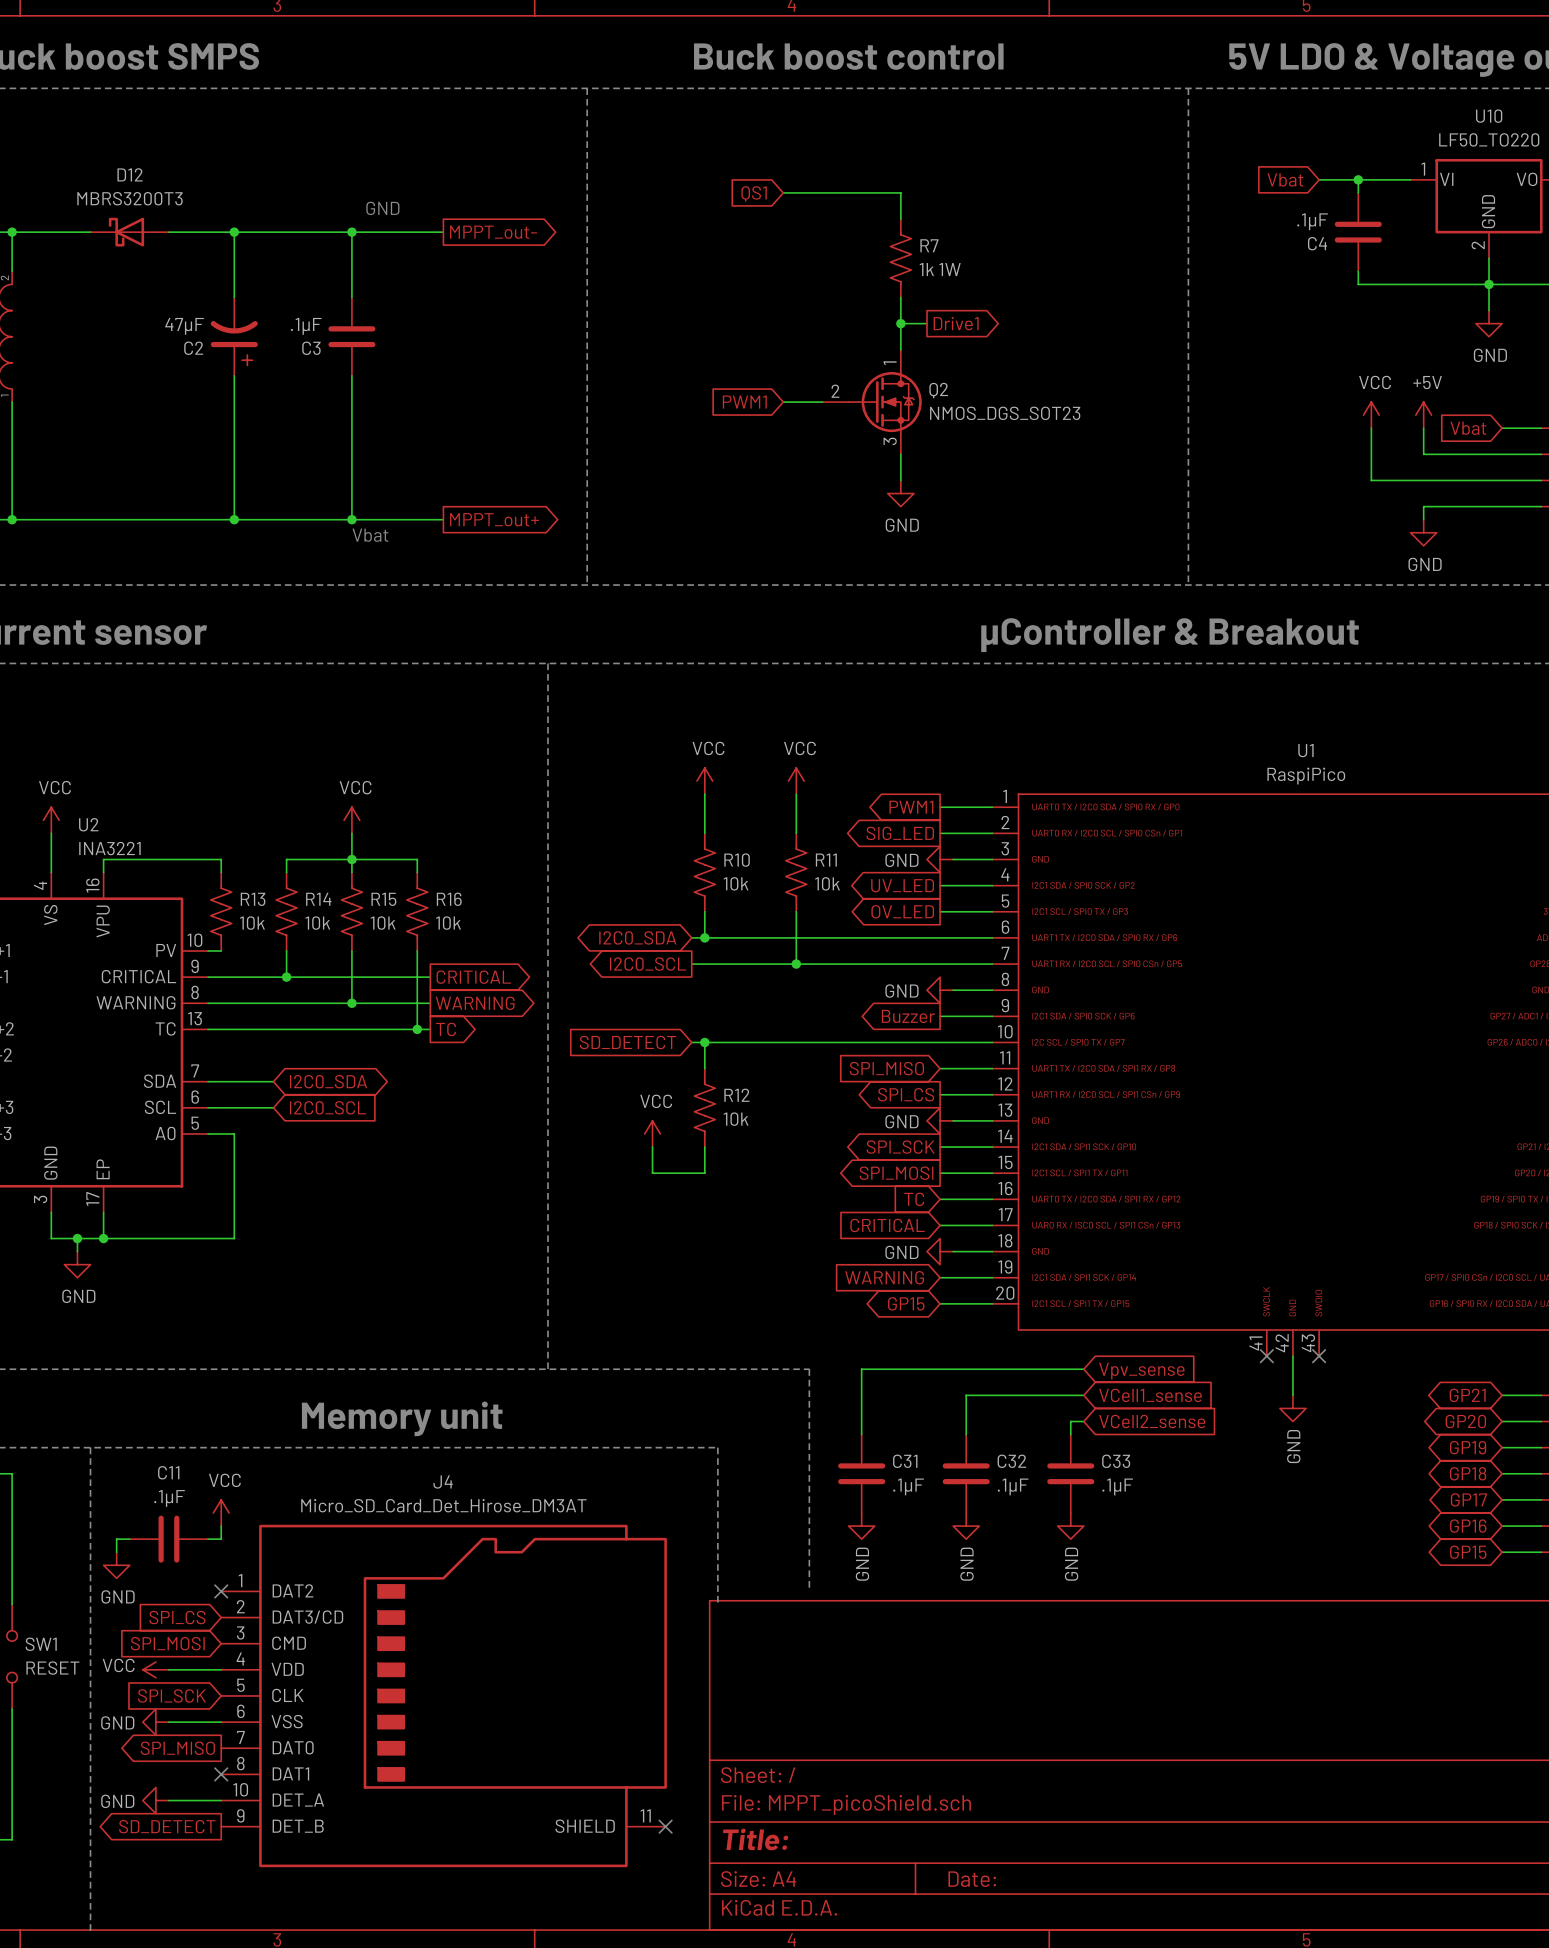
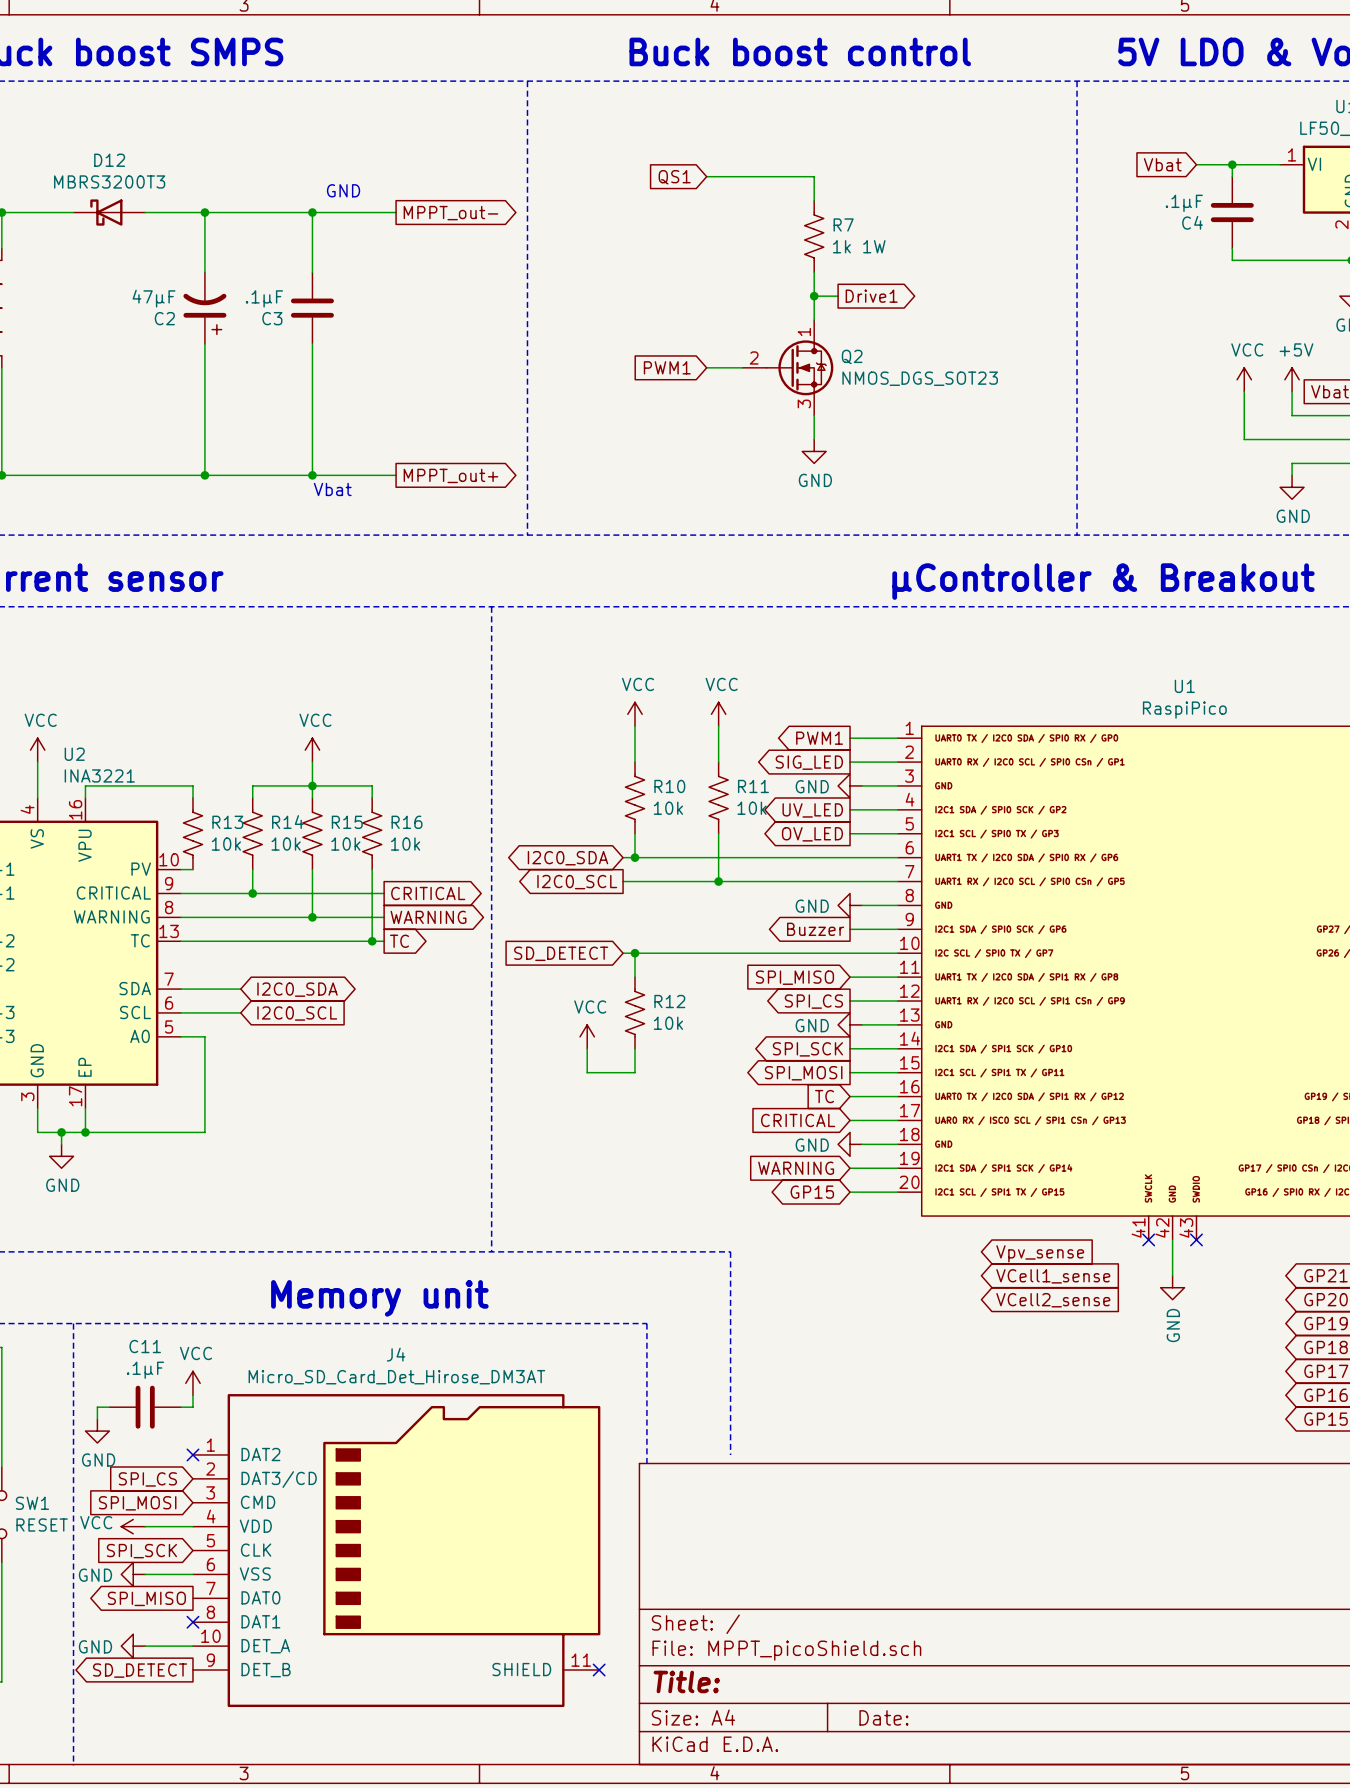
wire: (1083, 1369) (861, 1369) (861, 1434) -> none
wire: (1083, 1395) (966, 1395) (966, 1434) -> none
wire: (1083, 1421) (1070, 1421) (1070, 1434) -> none
C31: .1µF (861, 1473) -> none
C32: .1µF (966, 1473) -> none
C33: .1µF (1070, 1473) -> none
power symbol: GND (861, 1526) -> none
power symbol: GND (966, 1526) -> none
power symbol: GND (1070, 1526) -> none

